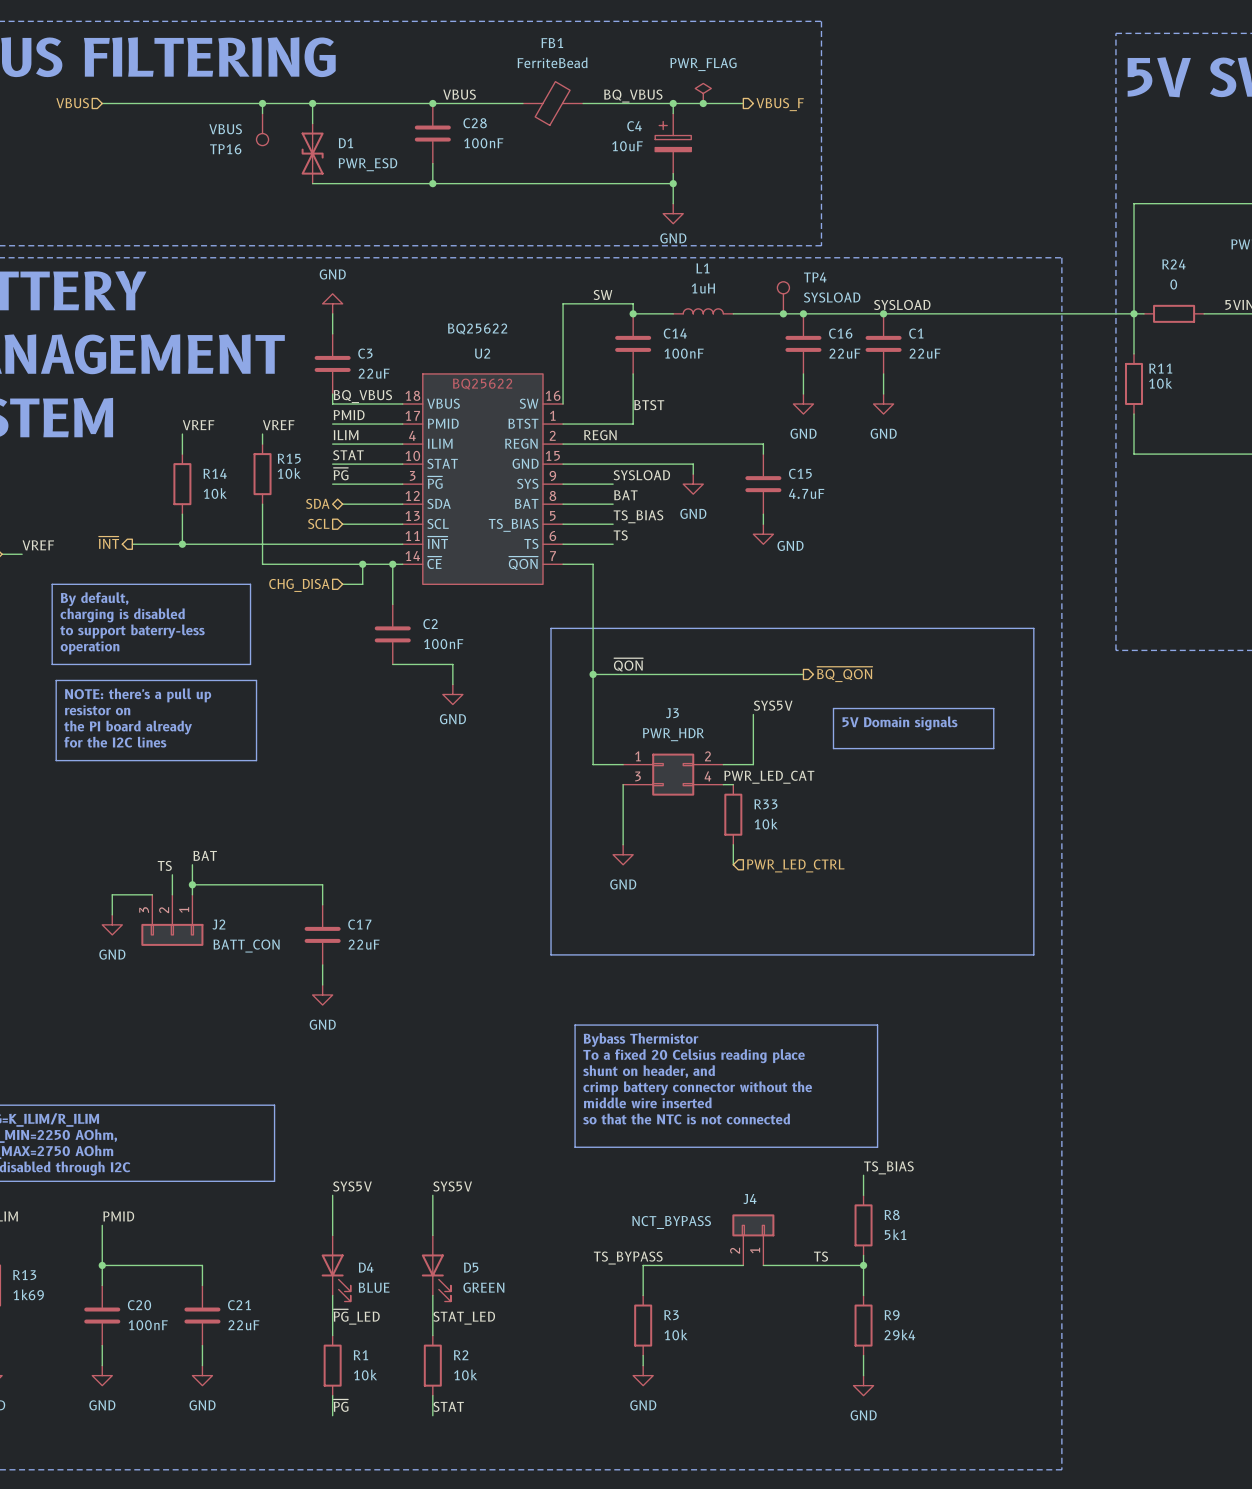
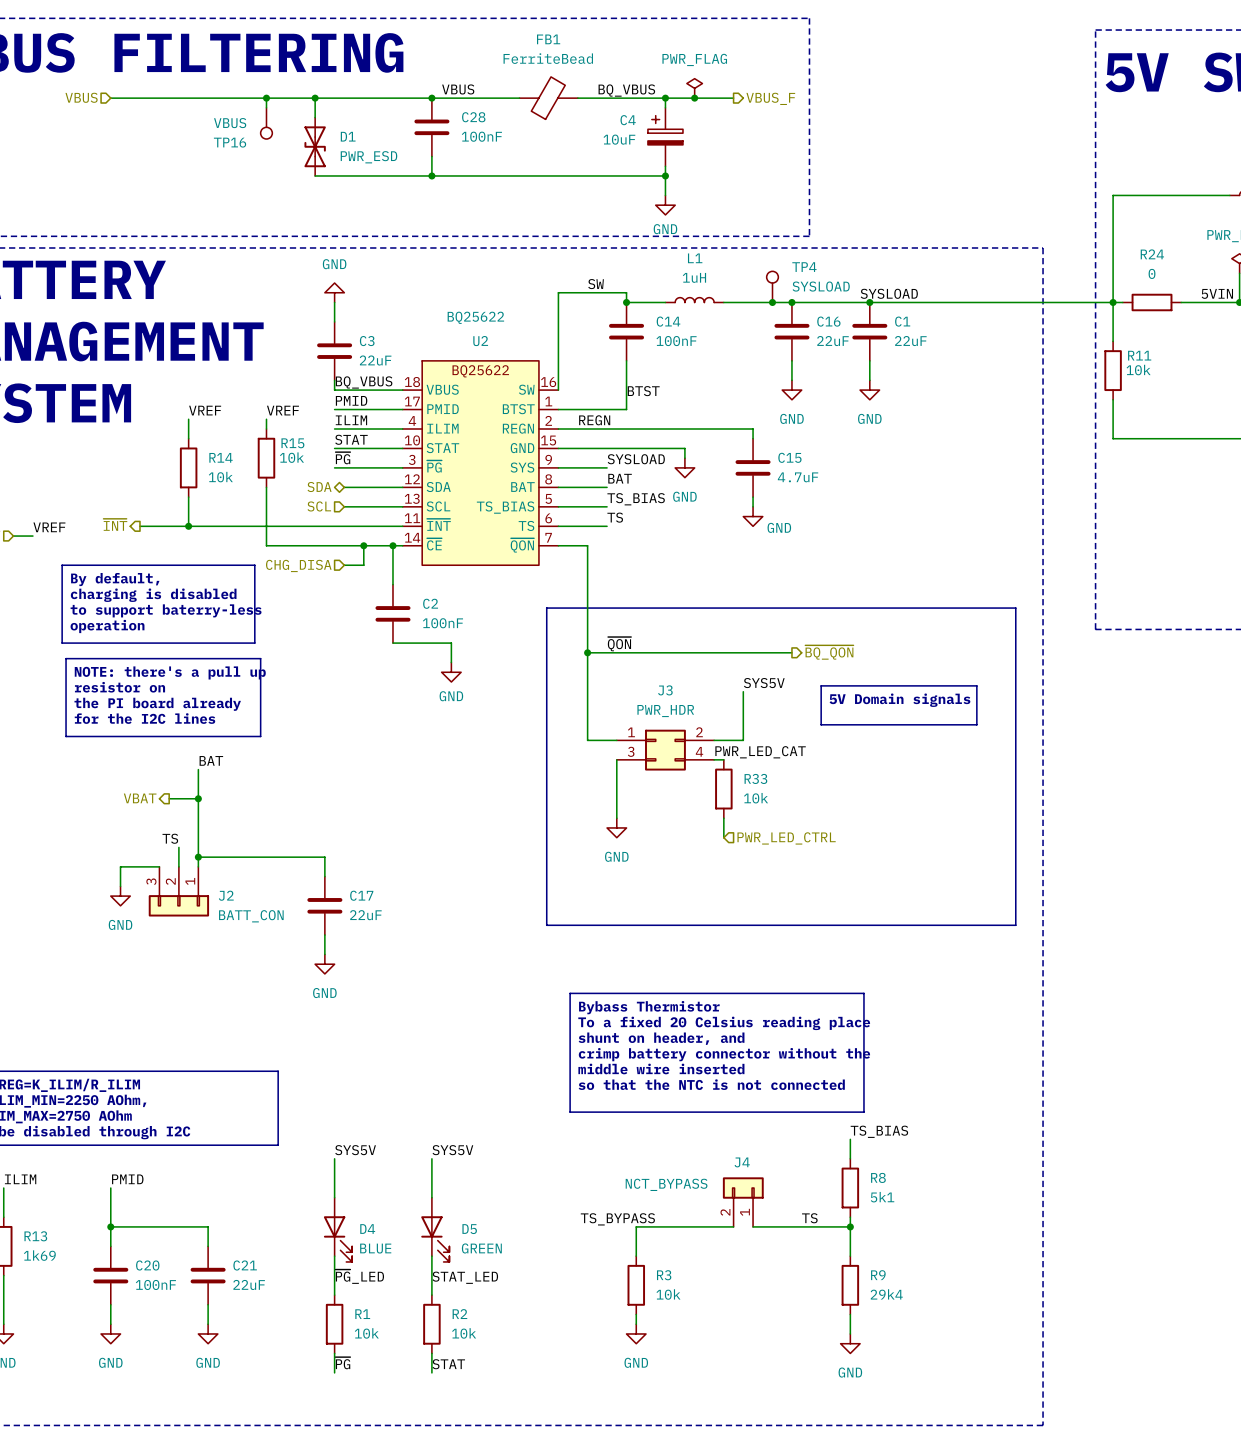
wire: none -> (198, 769) (198, 837)
hierarchical label: none -> VBAT (140, 798)
wire: none -> (169, 798) (198, 798)
junction: none -> (198, 798)
label position: BAT (205, 855) -> BAT (211, 760)

